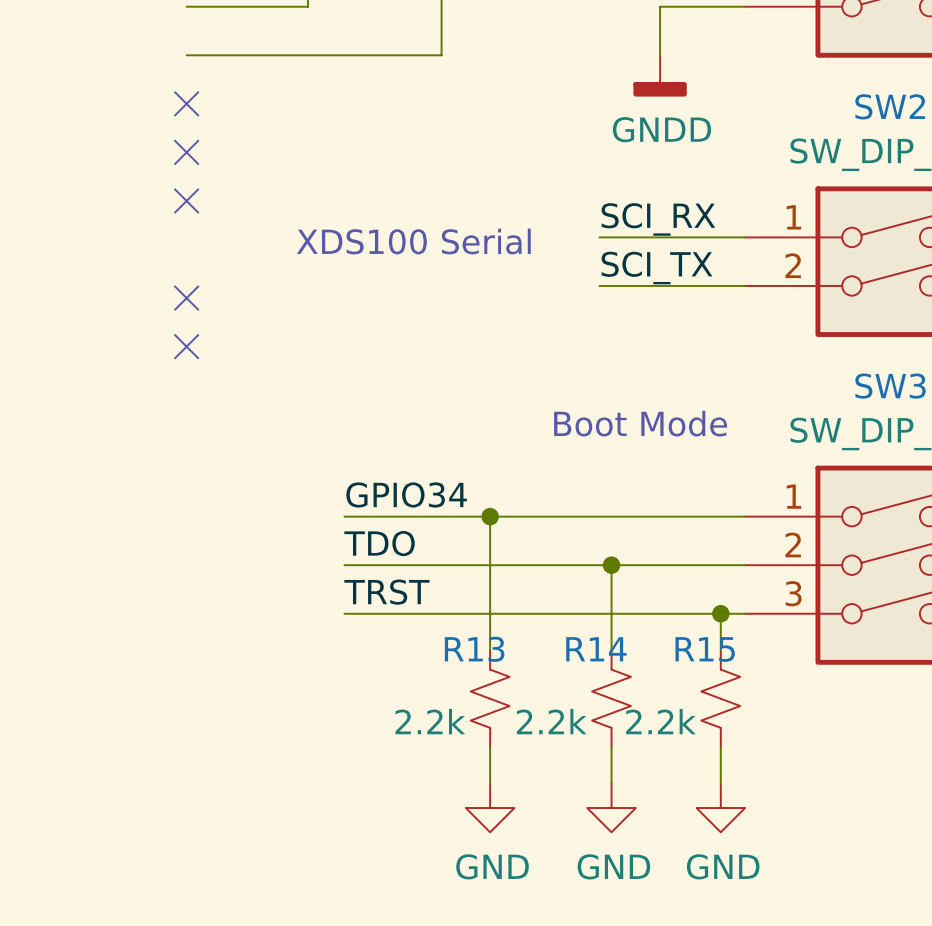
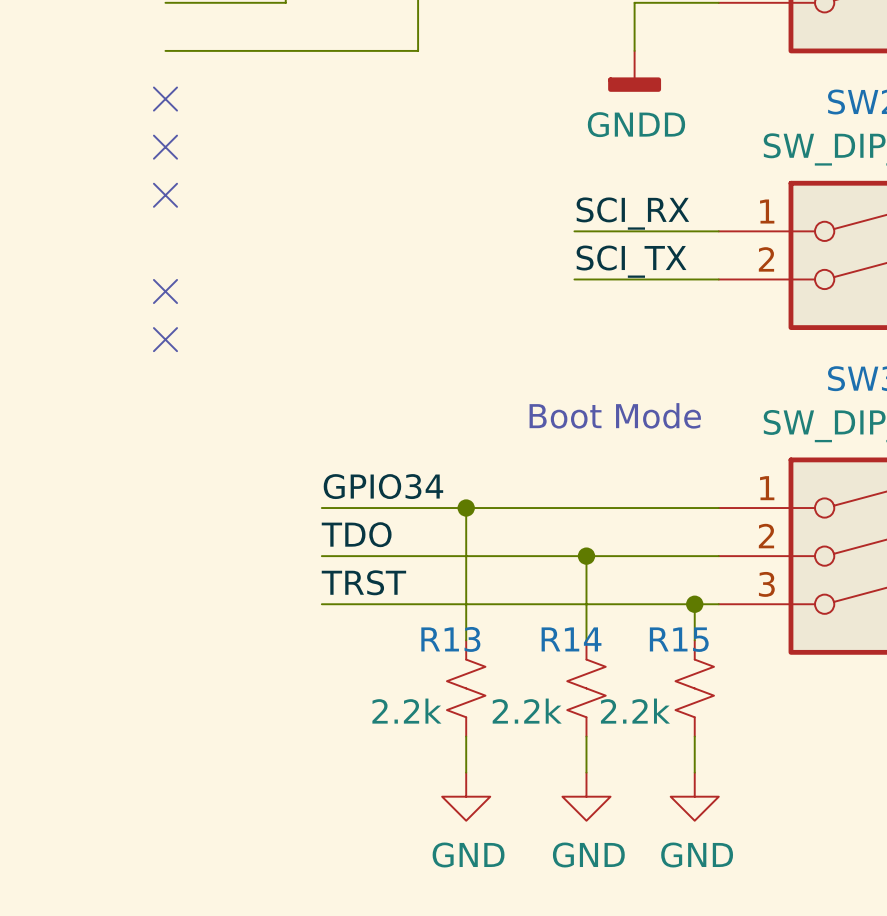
text: XDS100 Serial (413, 241) -> none

